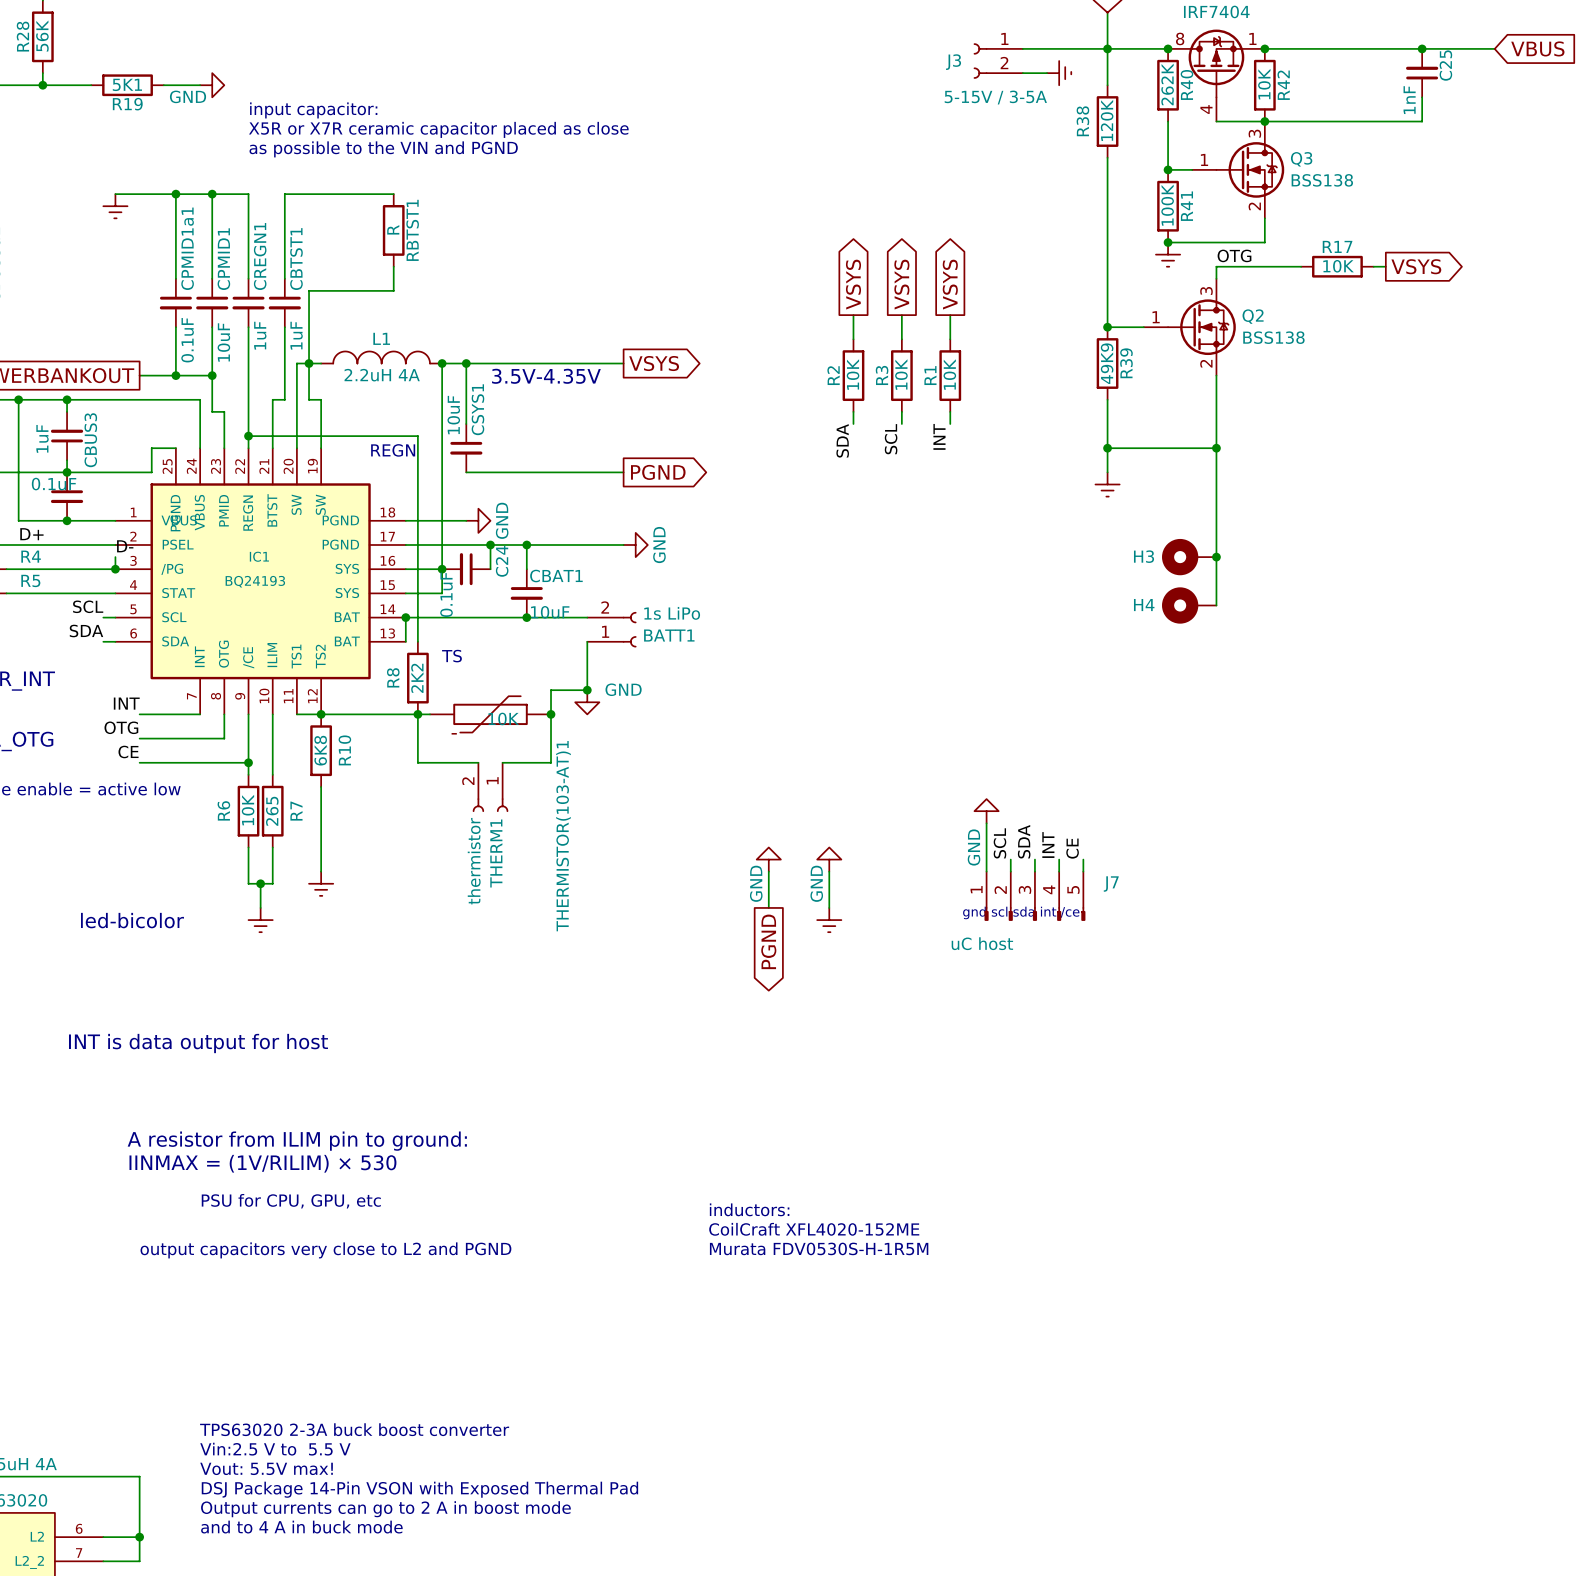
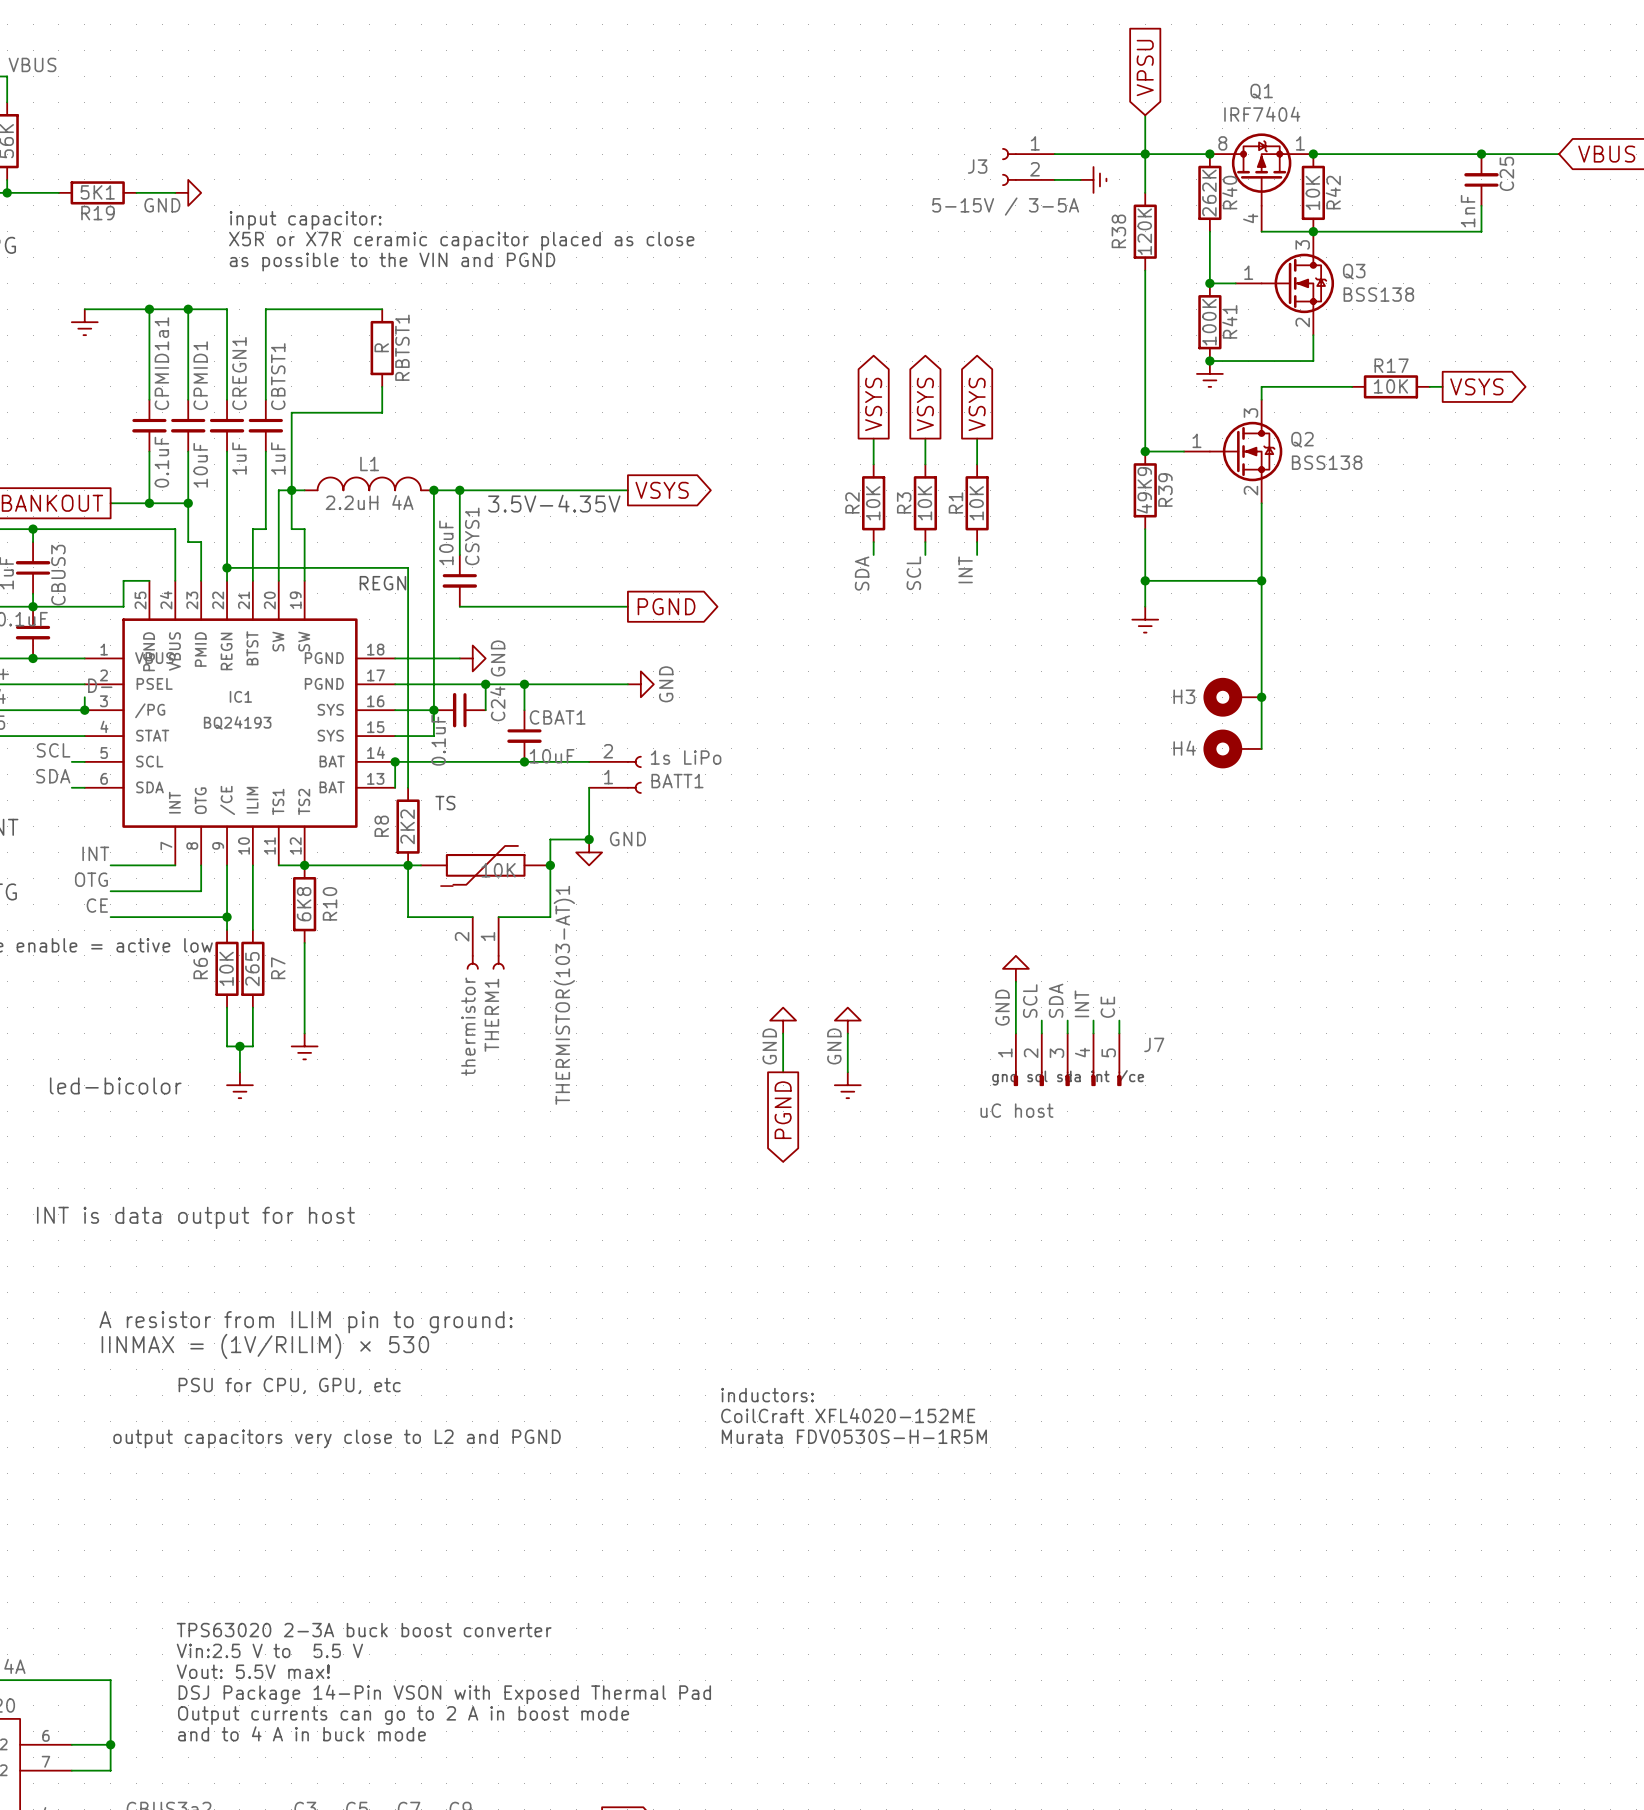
label: OTG (1234, 255) -> none

